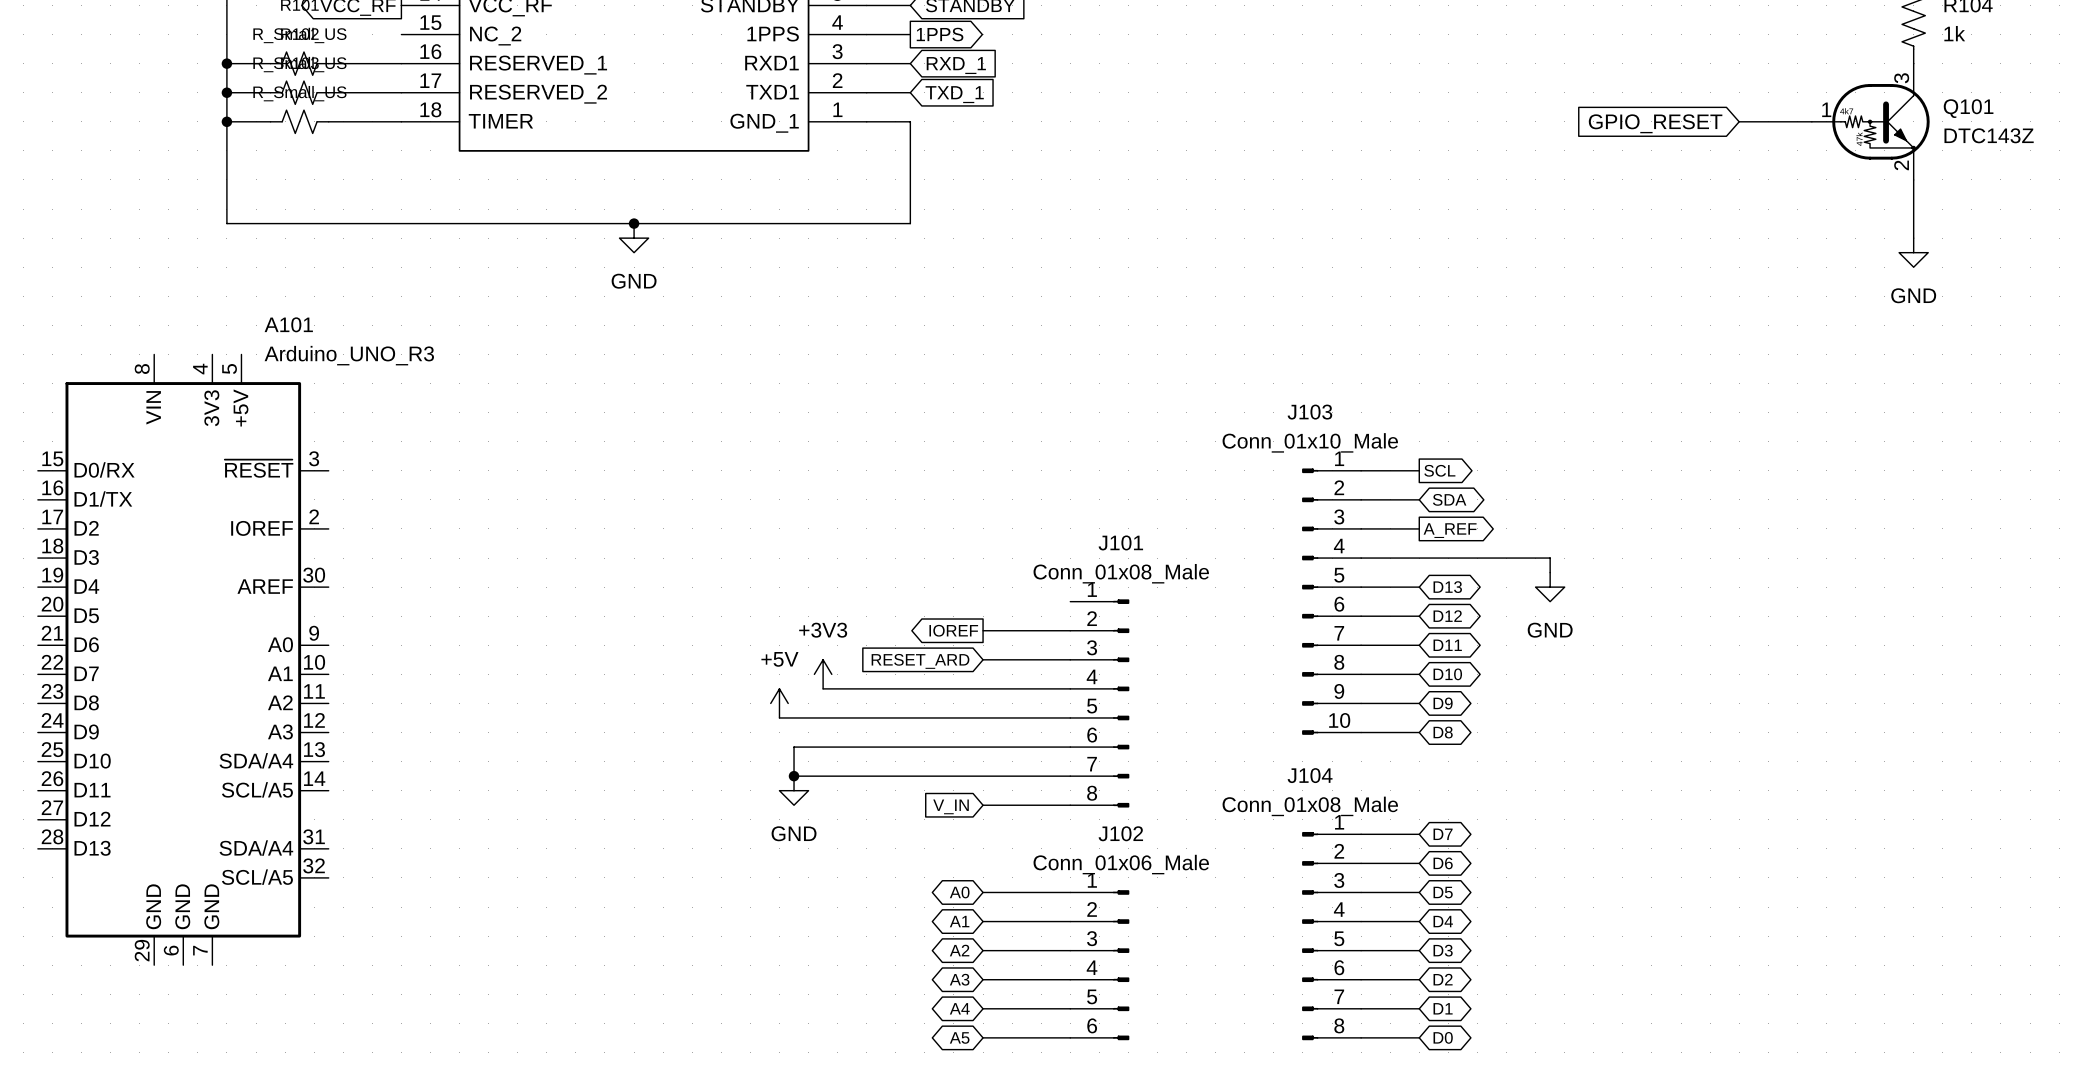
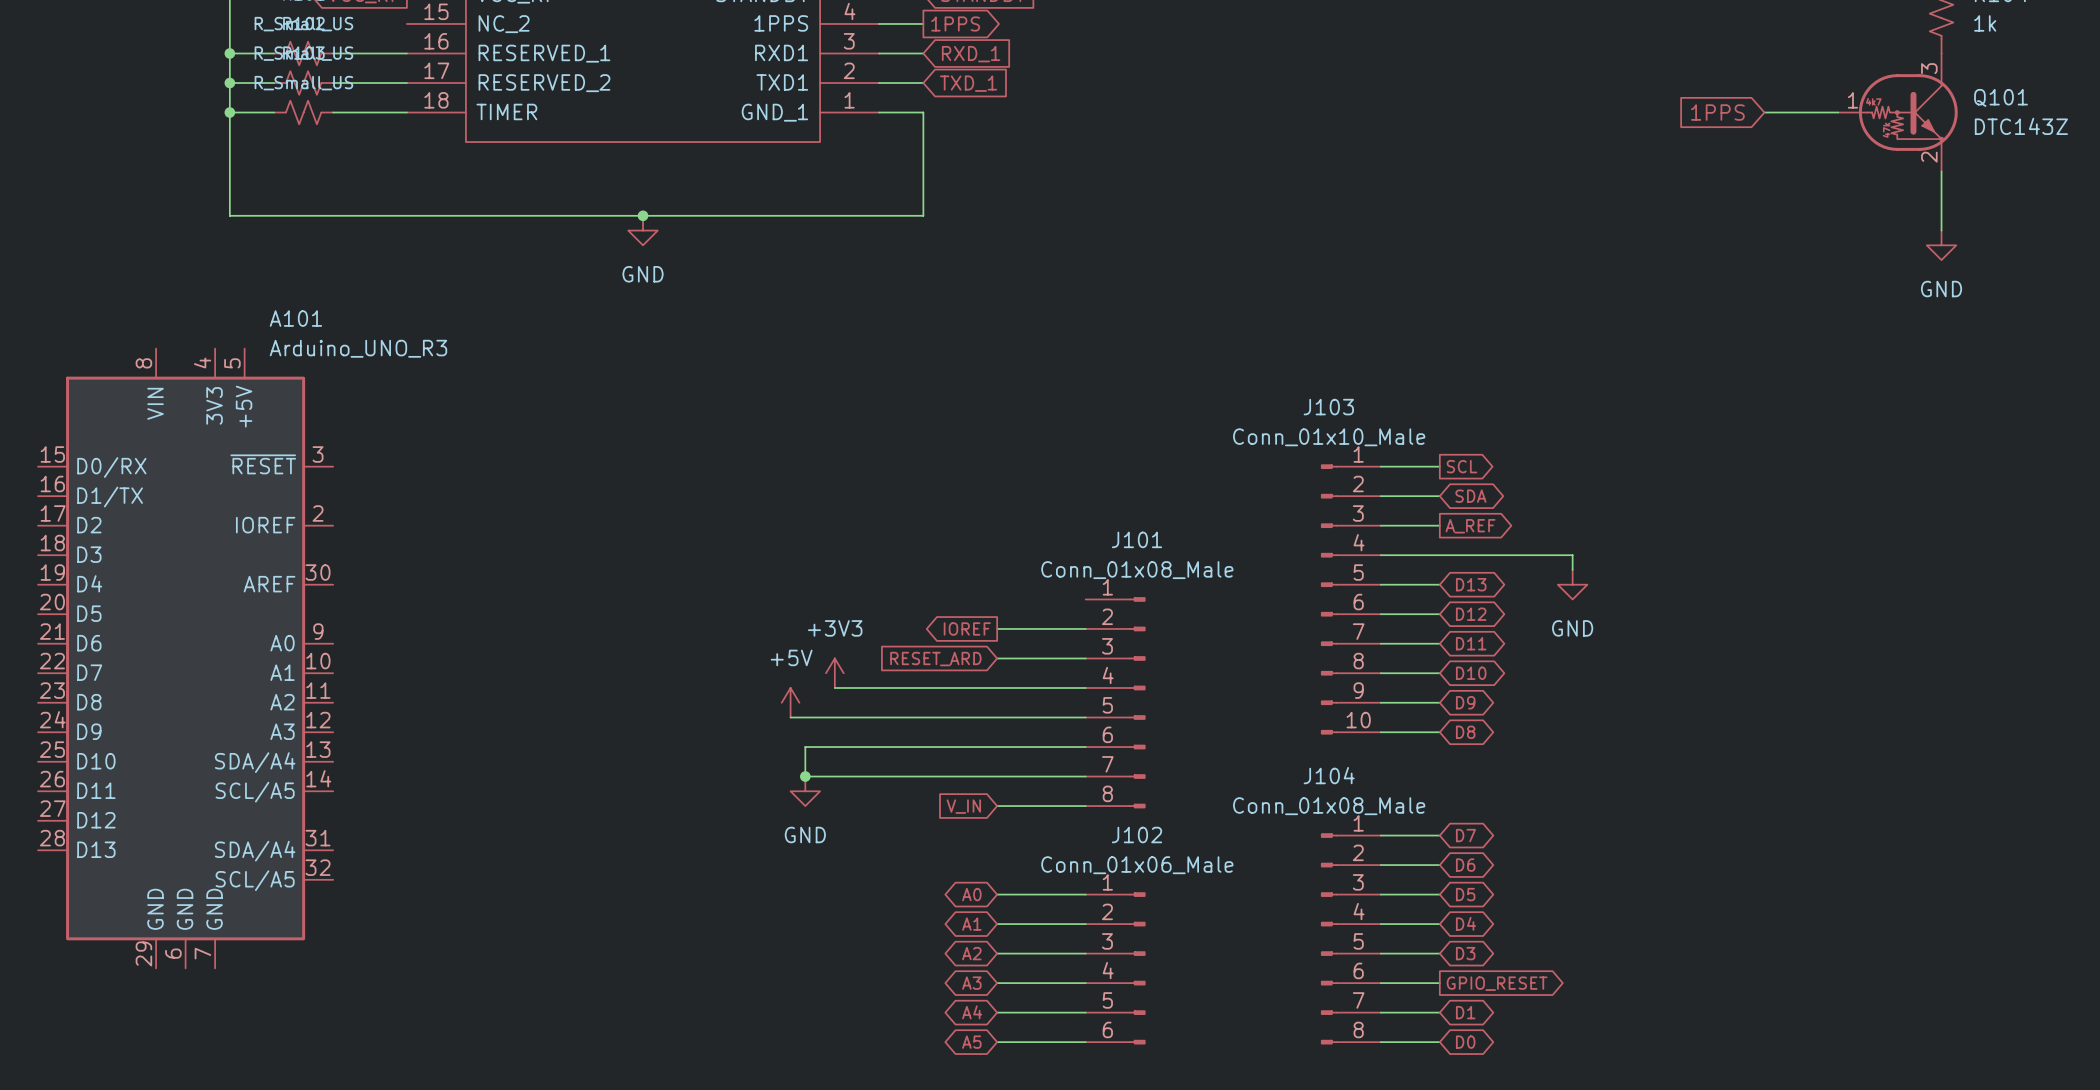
global label: GPIO_RESET (1655, 123) -> 1PPS (1717, 112)
global label shape: bidirectional (1443, 979) -> output (1497, 983)
global label: D2 (1443, 979) -> GPIO_RESET (1497, 983)

